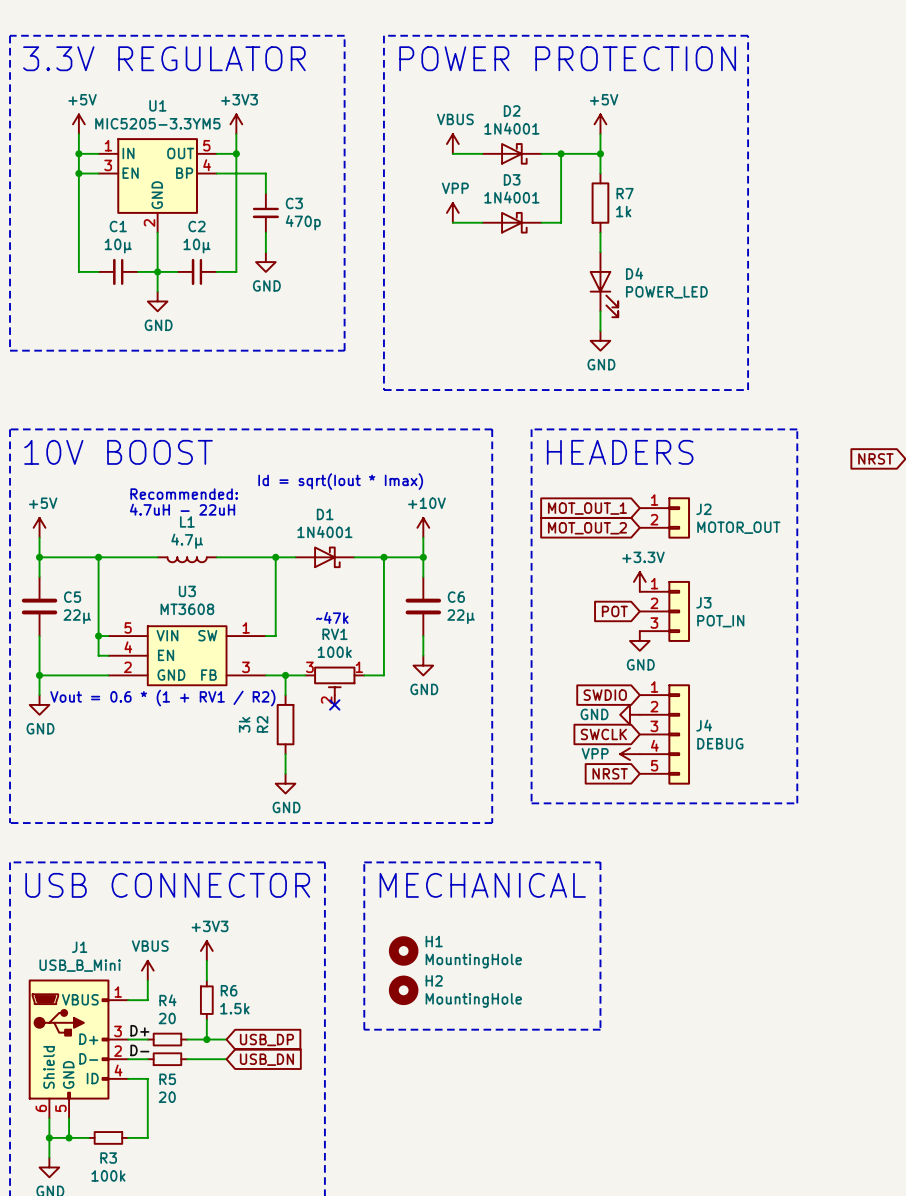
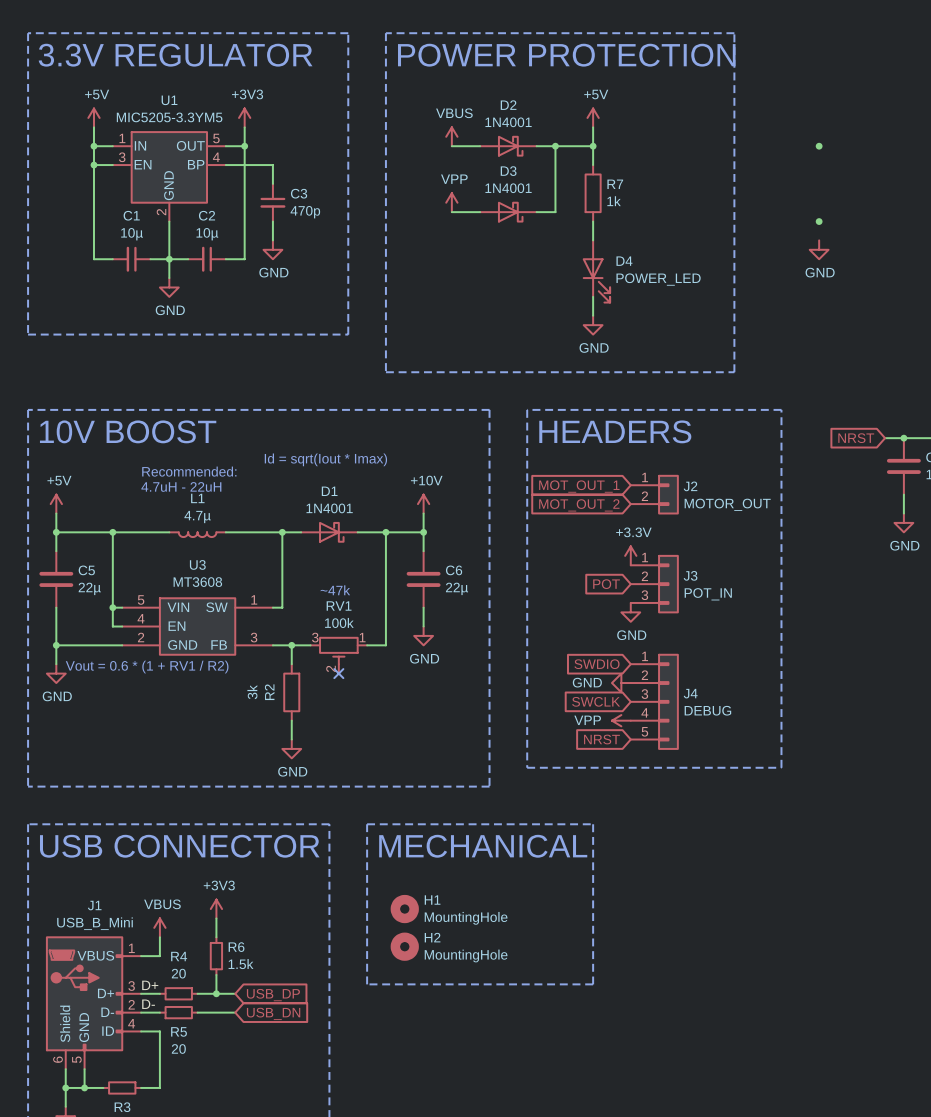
junction: none -> (819, 146)
junction: none -> (819, 221)
power symbol: none -> GND (819, 249)

